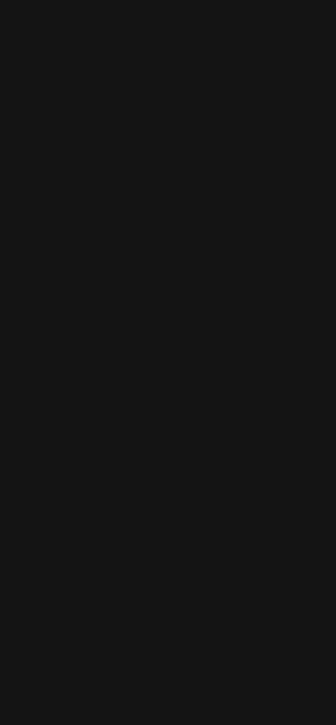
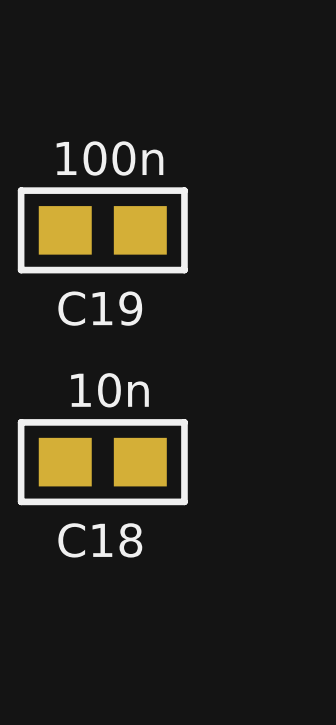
C19: none -> 100n (102, 230)
C18: none -> 10n (102, 462)

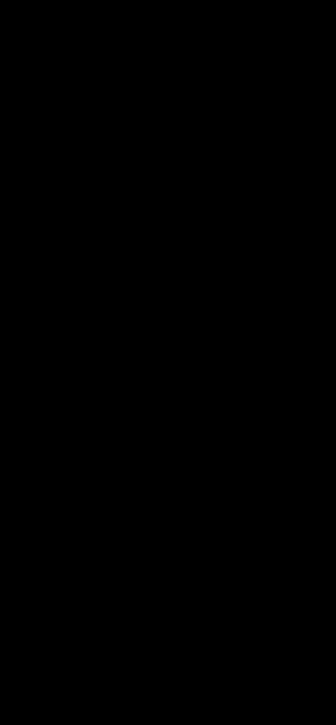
C19: 100n (102, 230) -> none
C18: 10n (102, 462) -> none

